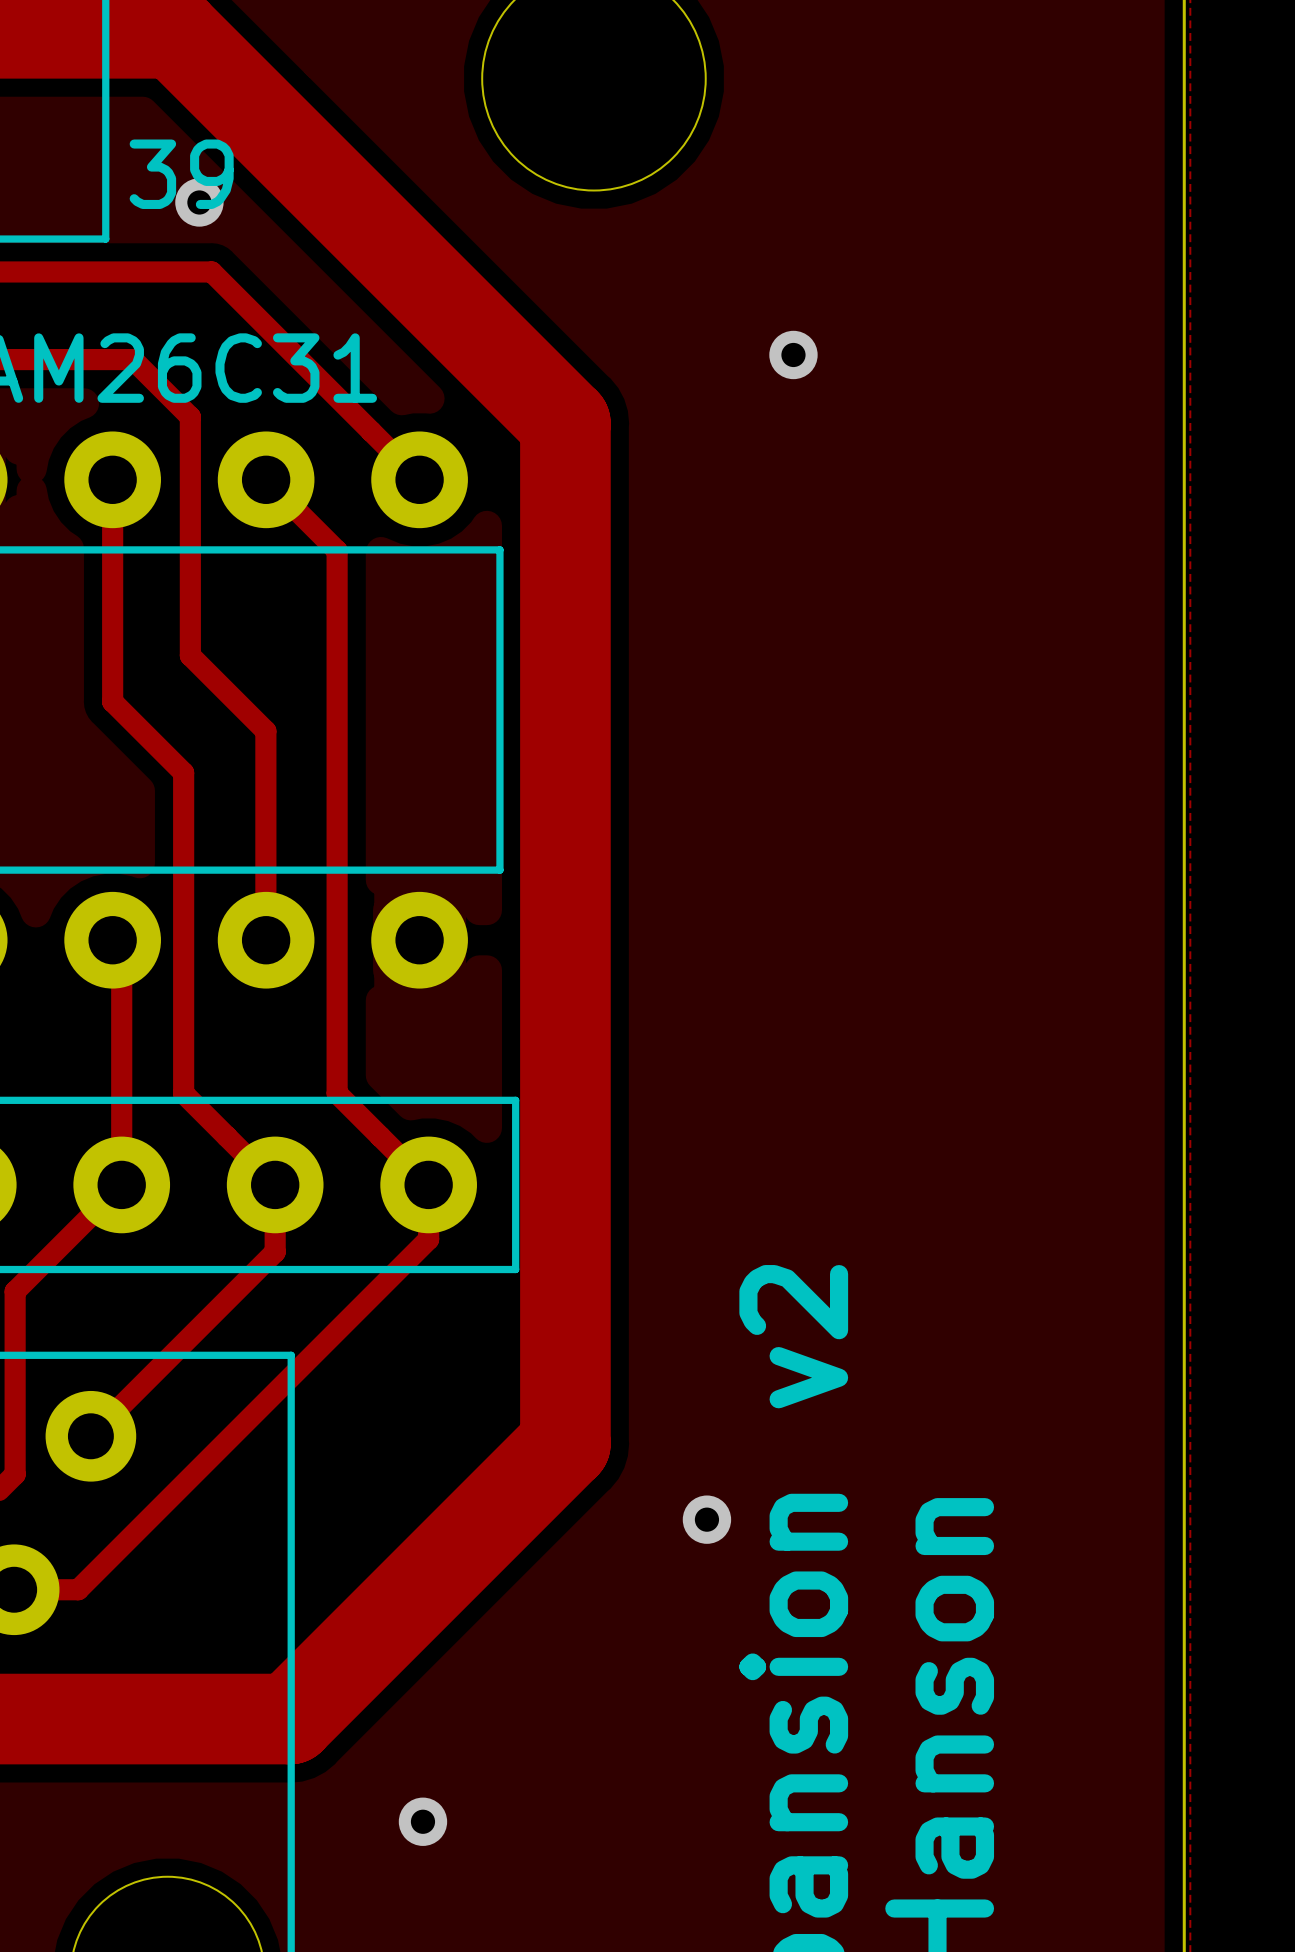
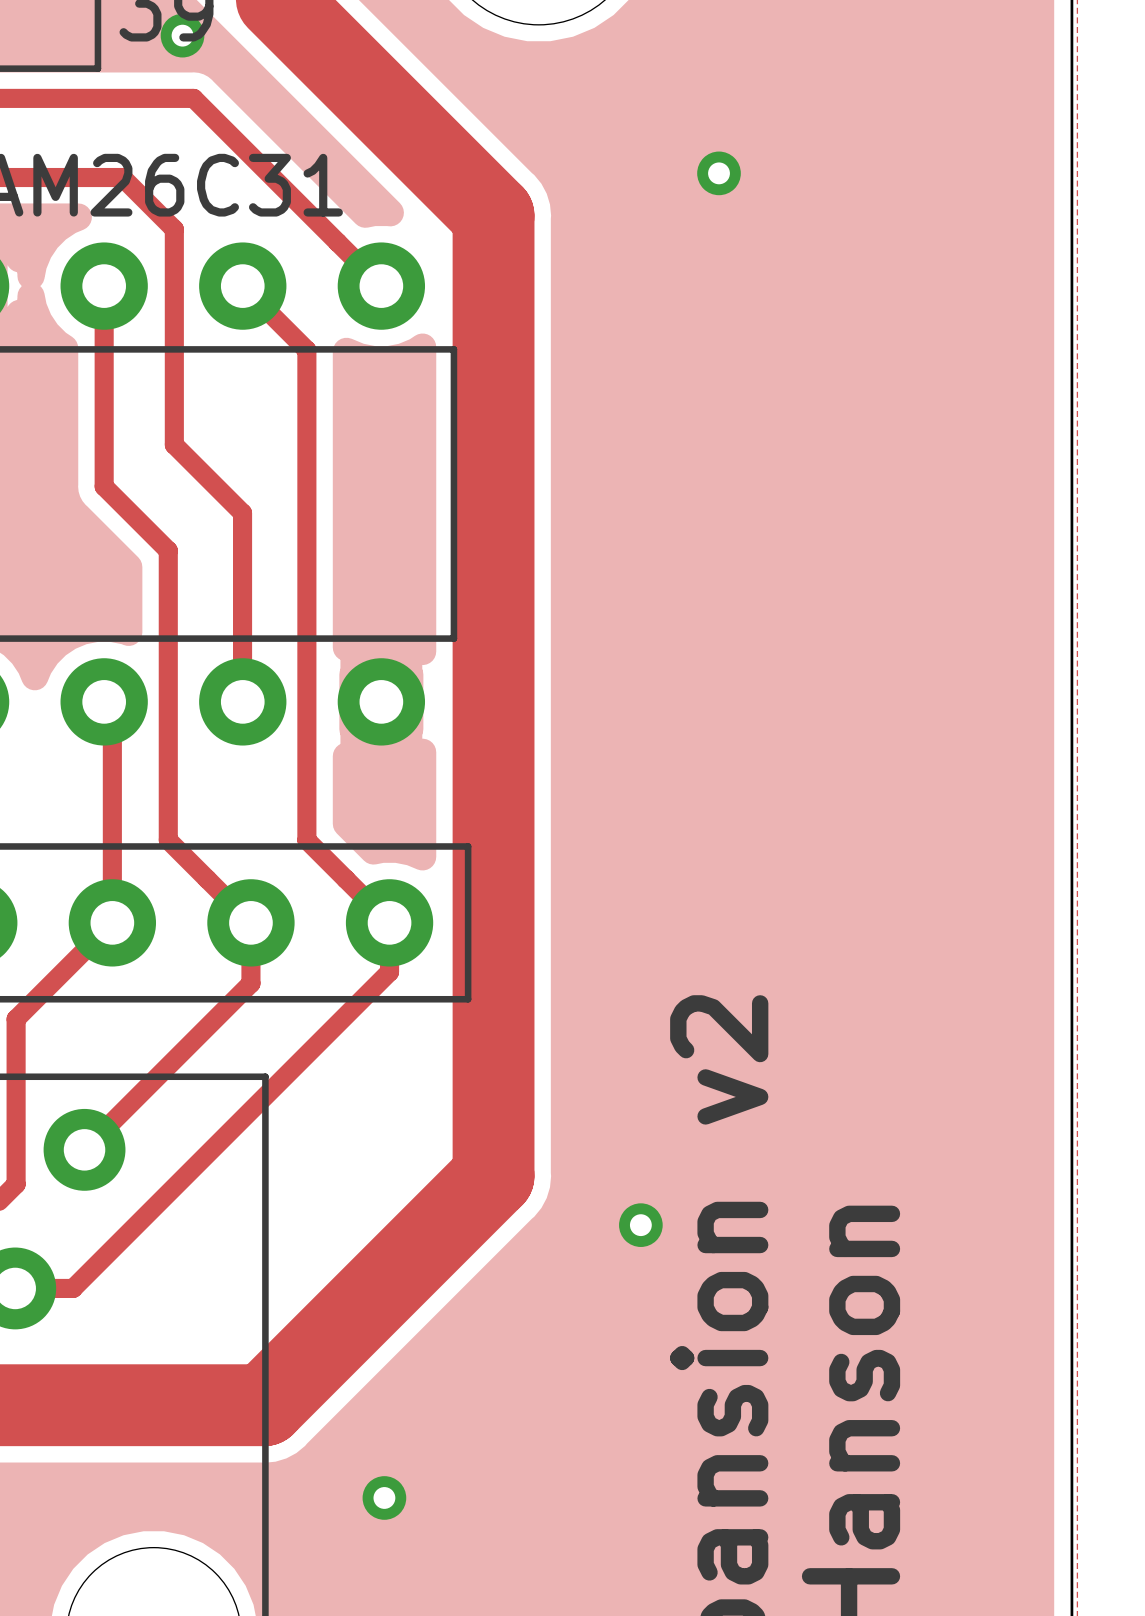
track: (543, 401) (565, 423) (565, 1443) (543, 1465) -> (493, 215) (493, 1176)

